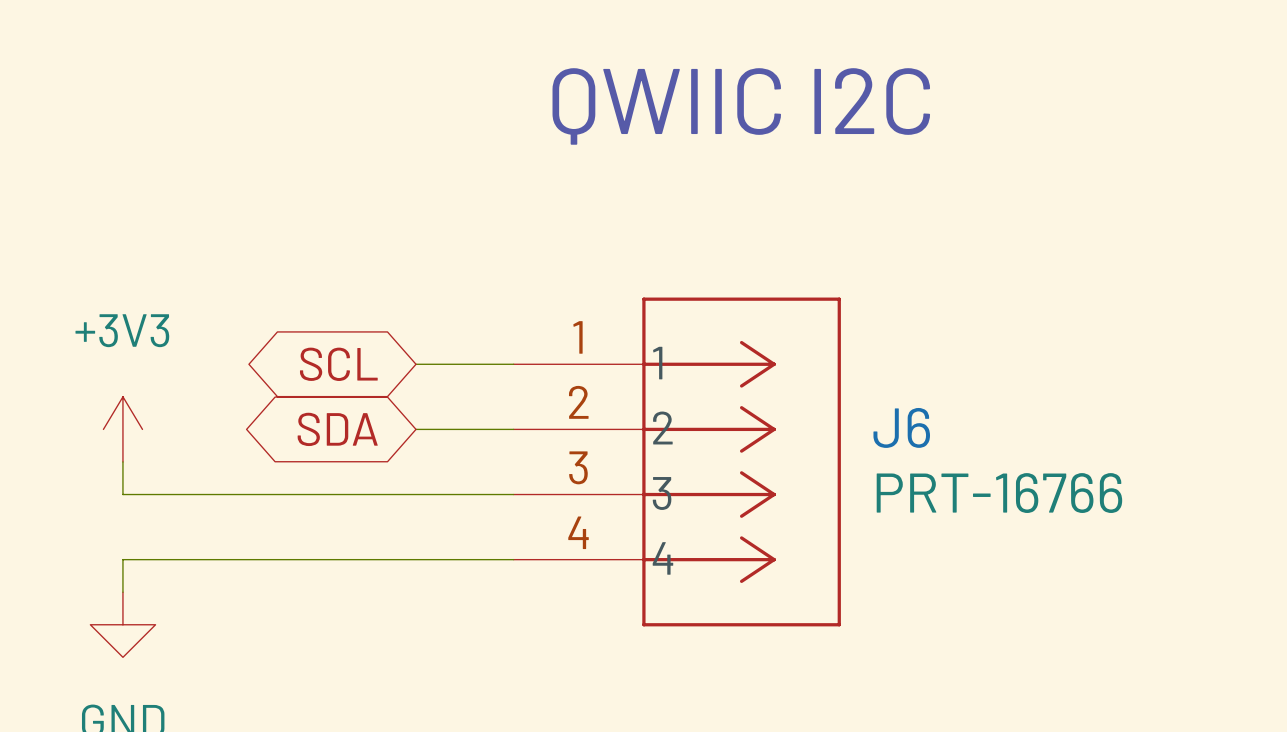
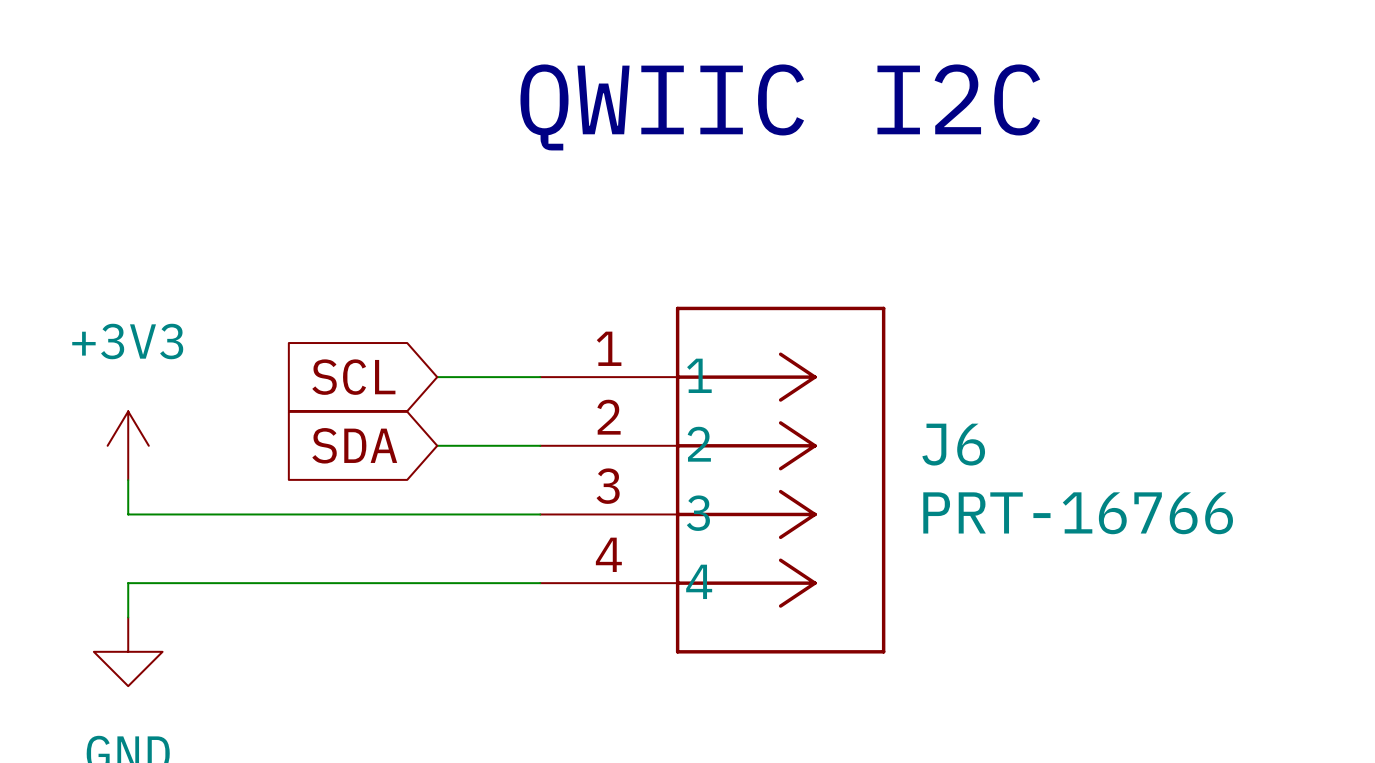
global label shape: bidirectional (338, 364) -> input (353, 377)
global label shape: bidirectional (337, 429) -> input (354, 445)

